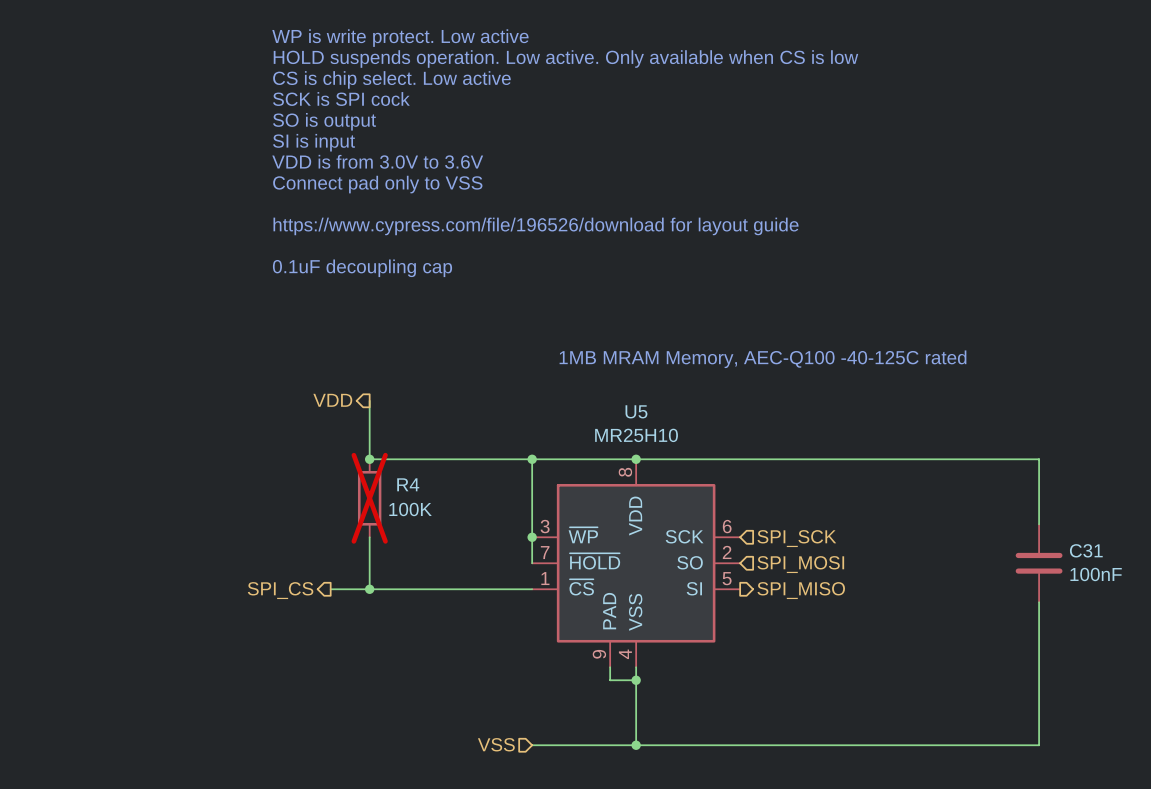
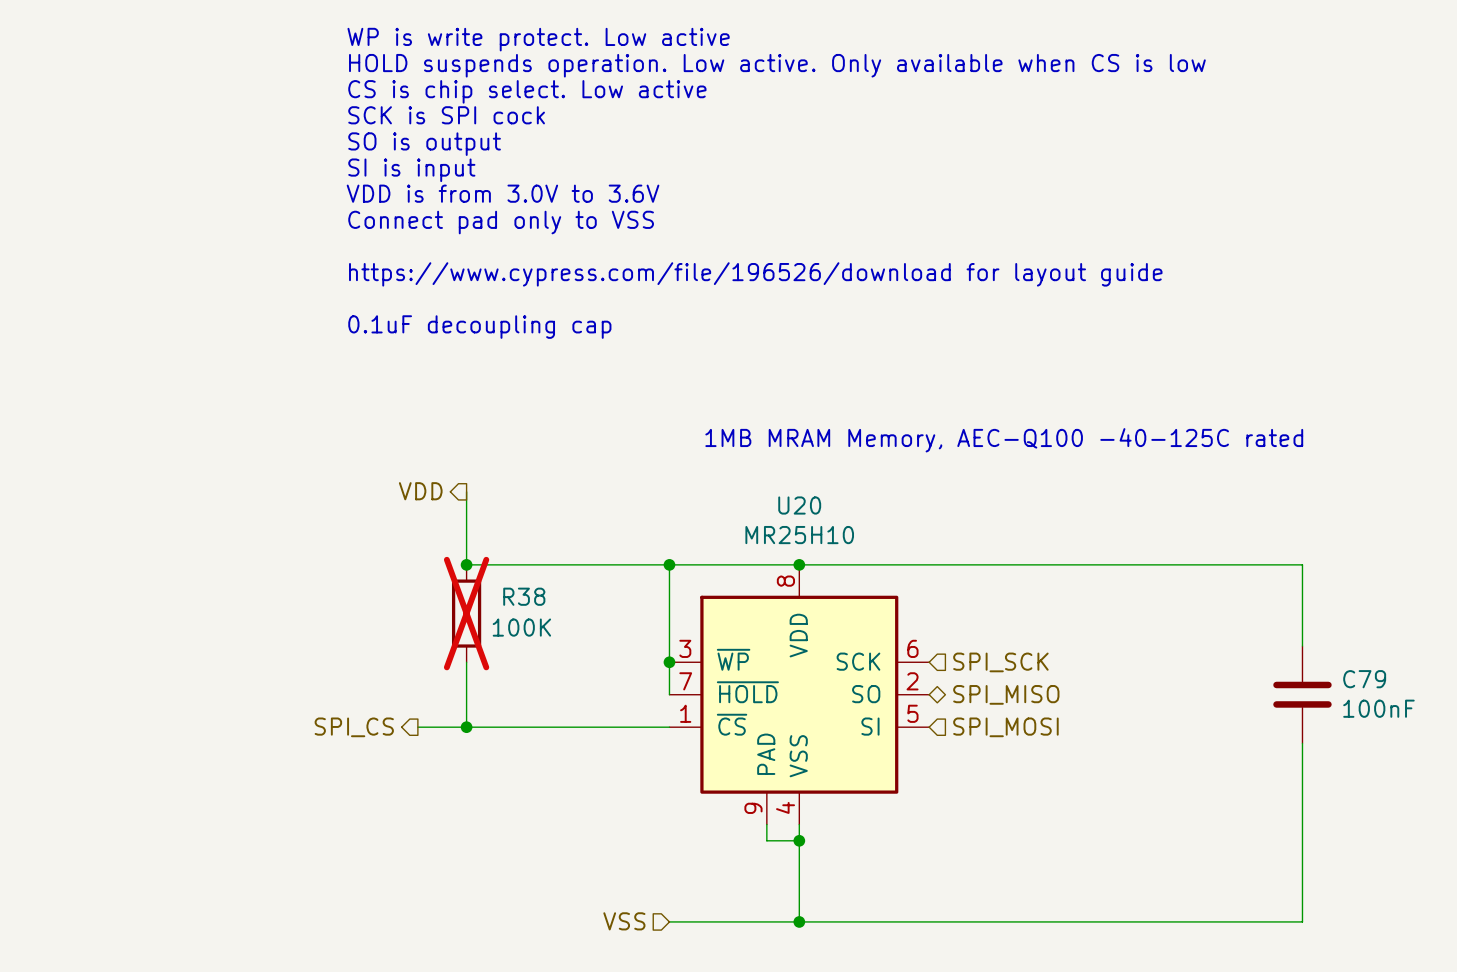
U5 name: U5 (636, 411) -> U20 (799, 505)
R4 name: R4 (408, 484) -> R38 (524, 596)
C31 name: C31 (1086, 550) -> C79 (1364, 679)
hierarchical label shape: input (800, 564) -> bidirectional (1006, 694)
hierarchical label: SPI_MOSI (800, 564) -> SPI_MISO (1006, 694)
hierarchical label shape: output (801, 590) -> input (1005, 727)
hierarchical label: SPI_MISO (801, 590) -> SPI_MOSI (1005, 727)

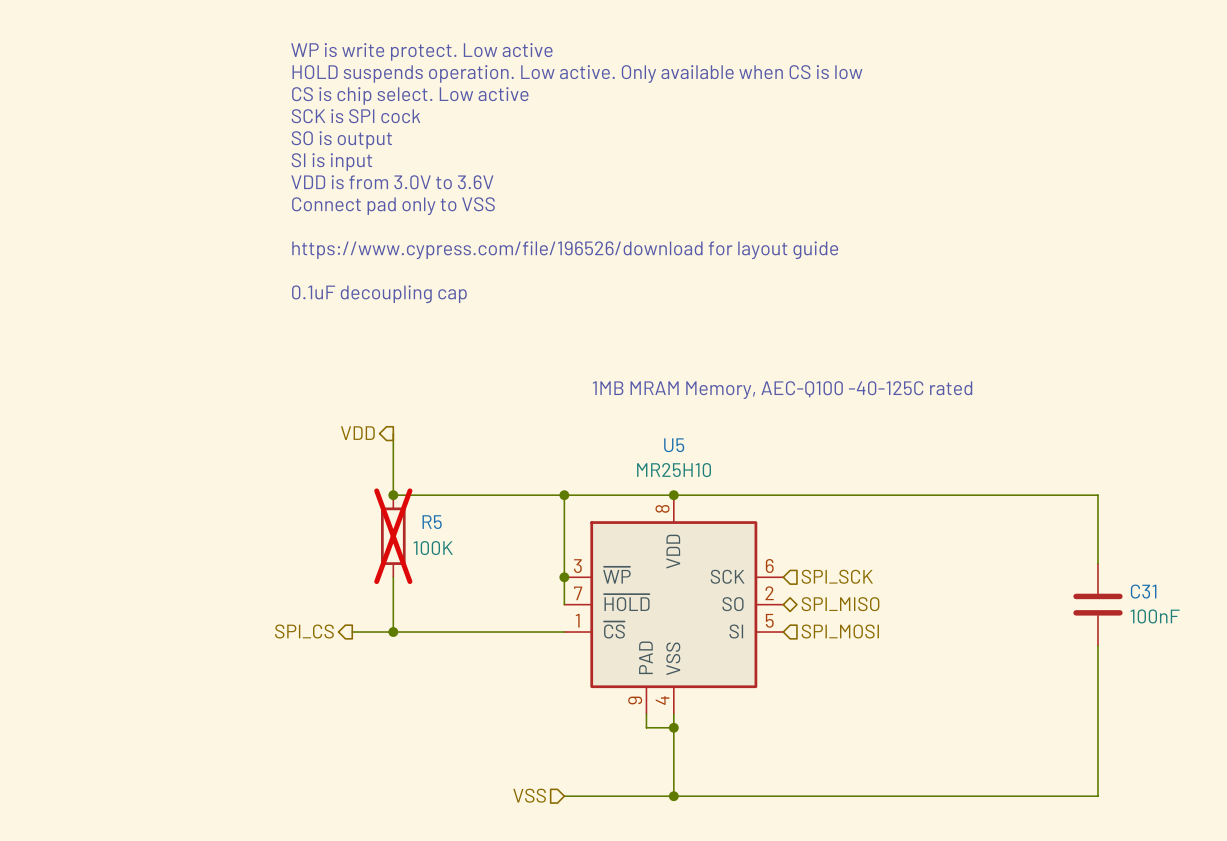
U20 name: U20 (799, 505) -> U5 (674, 445)
R38 name: R38 (524, 596) -> R5 (432, 522)
C79 name: C79 (1364, 679) -> C31 (1143, 591)

